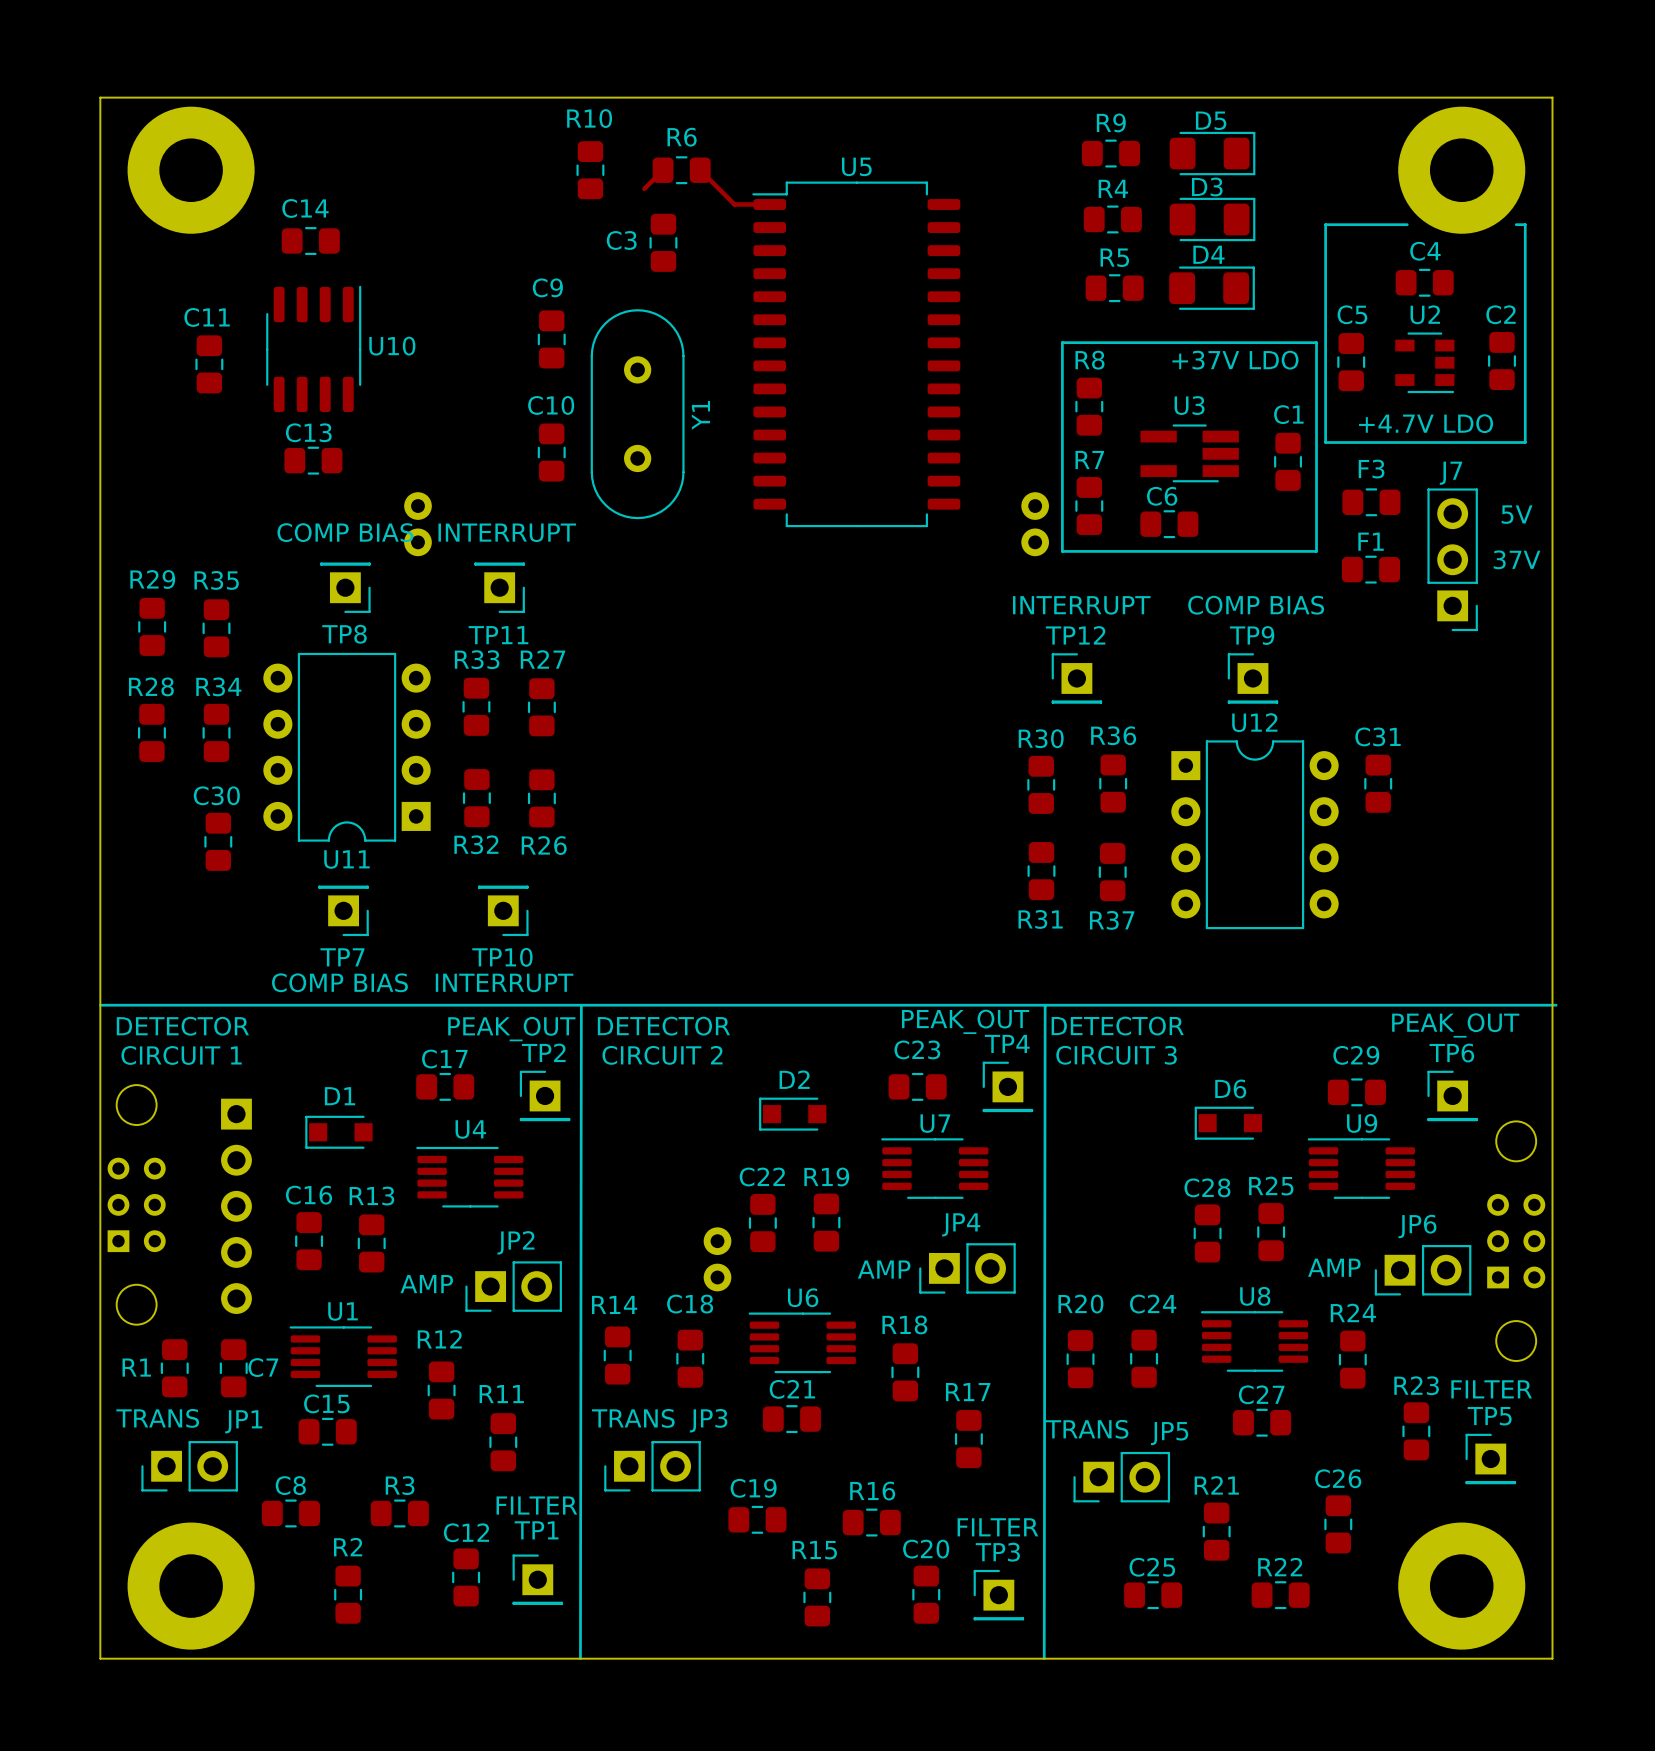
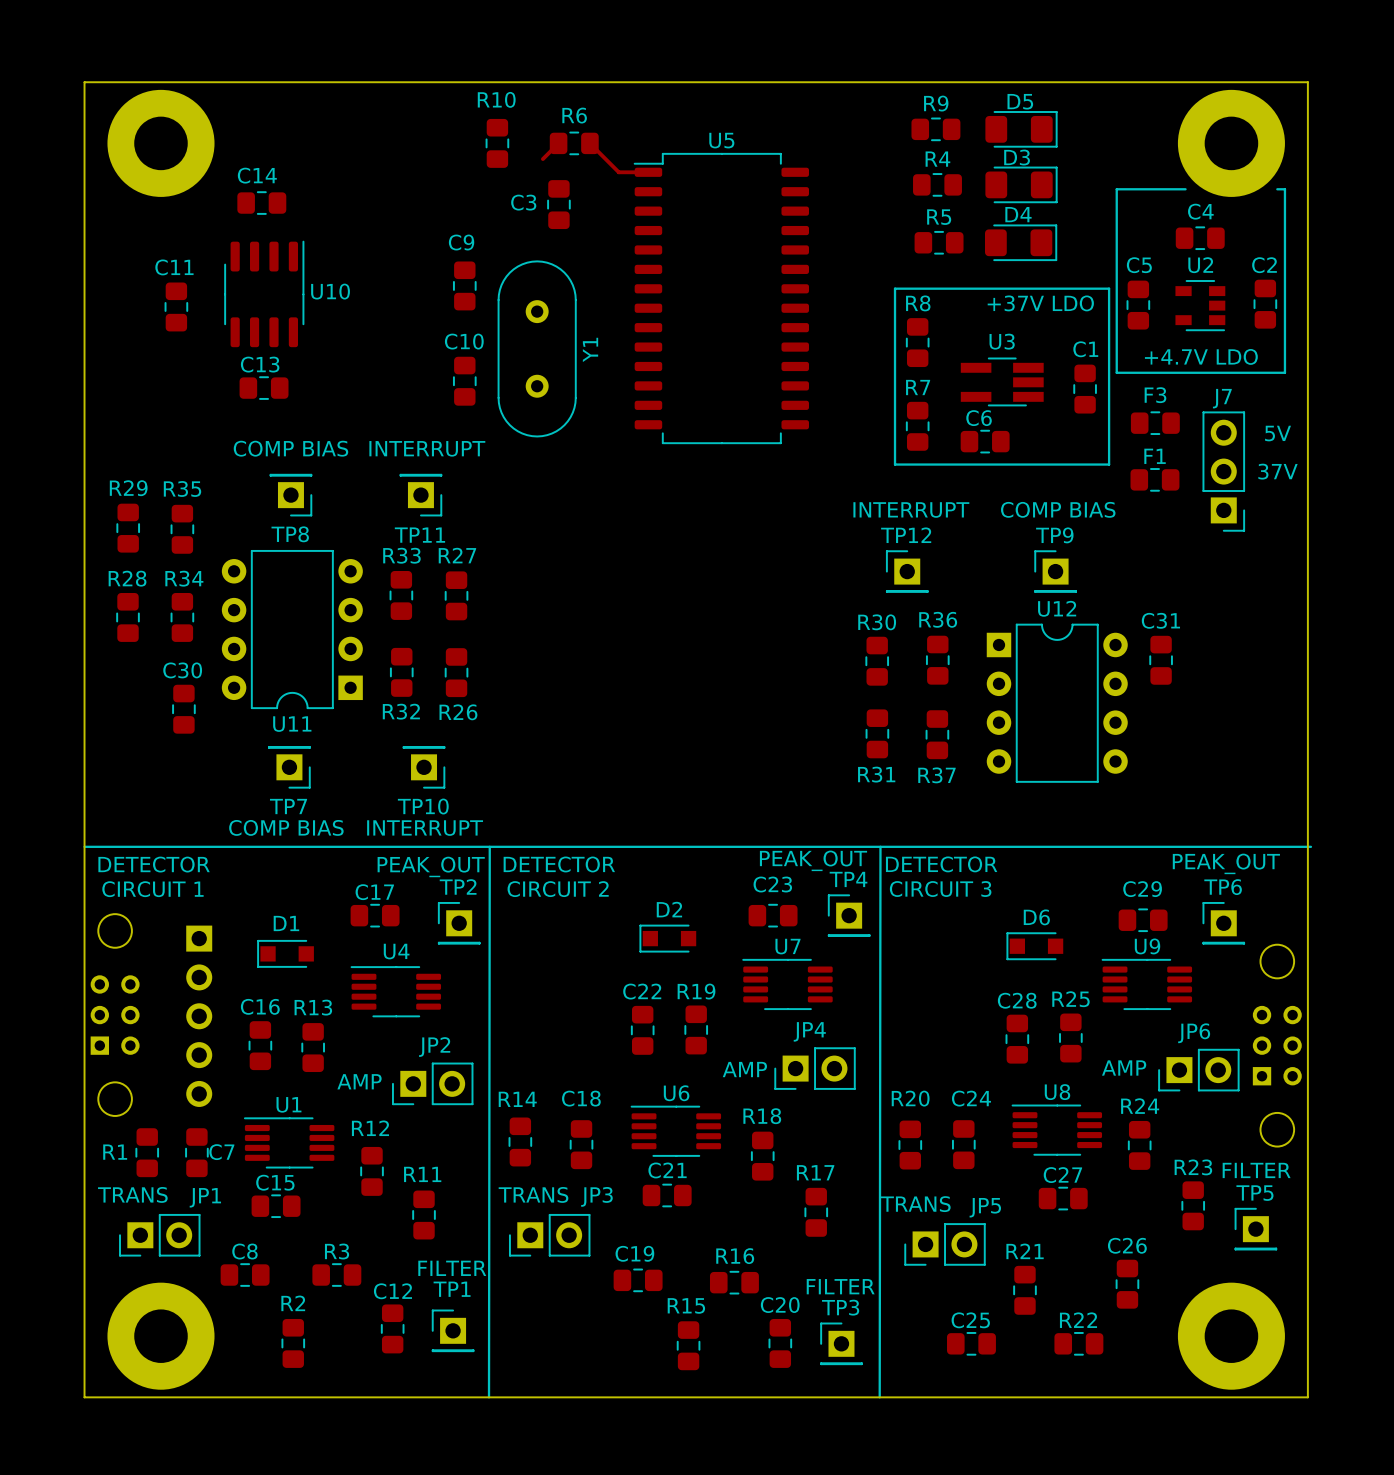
part: (418, 524) -> none
part: (1035, 524) -> none
part: (717, 1259) -> none

